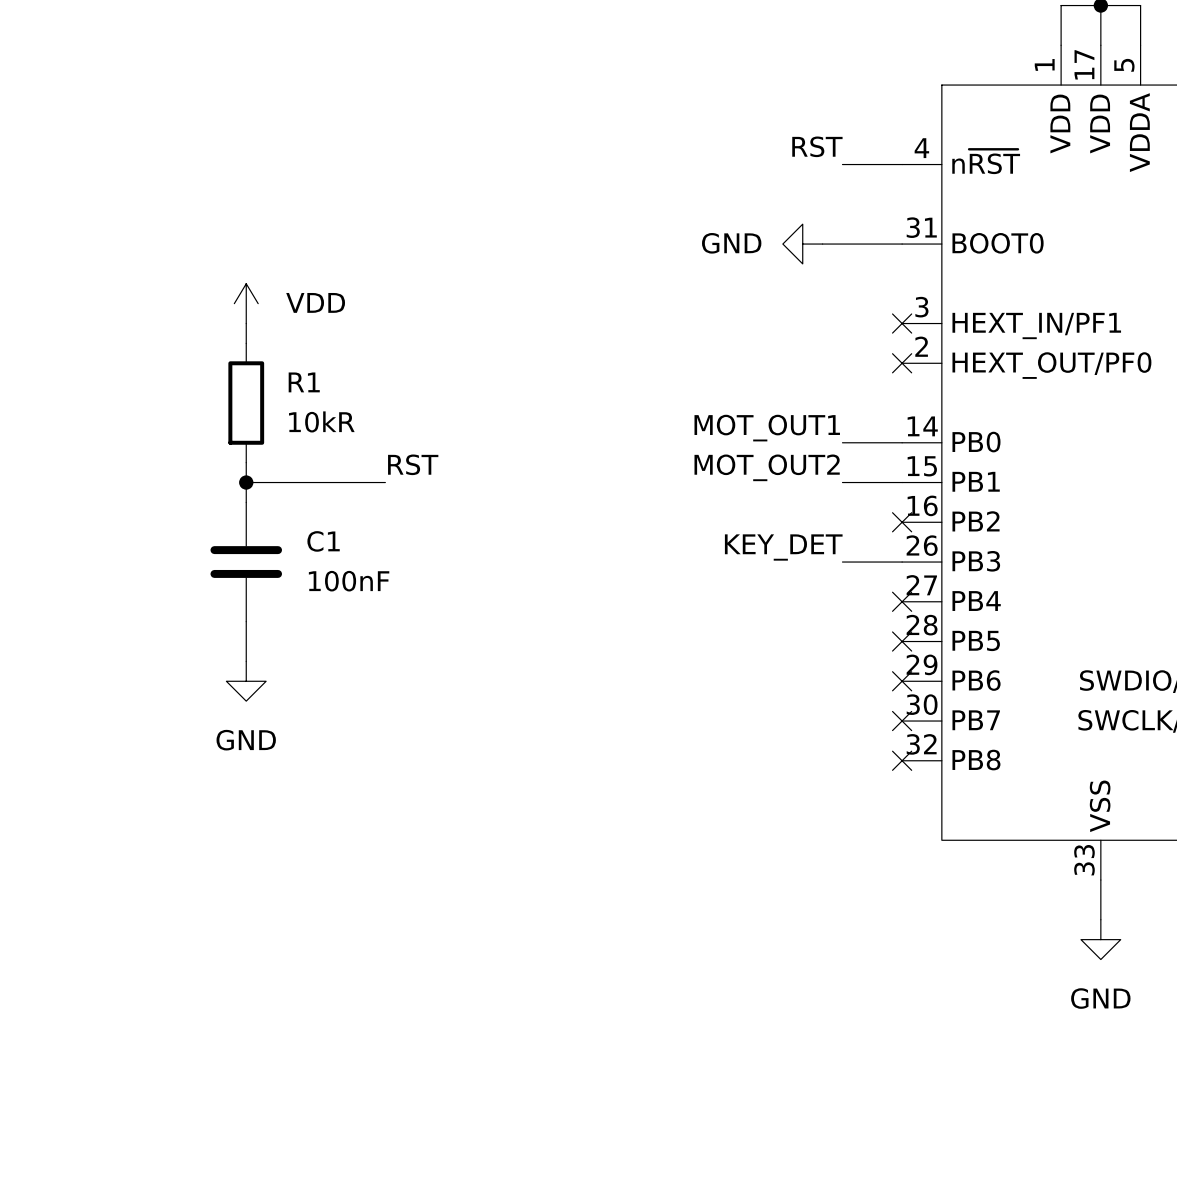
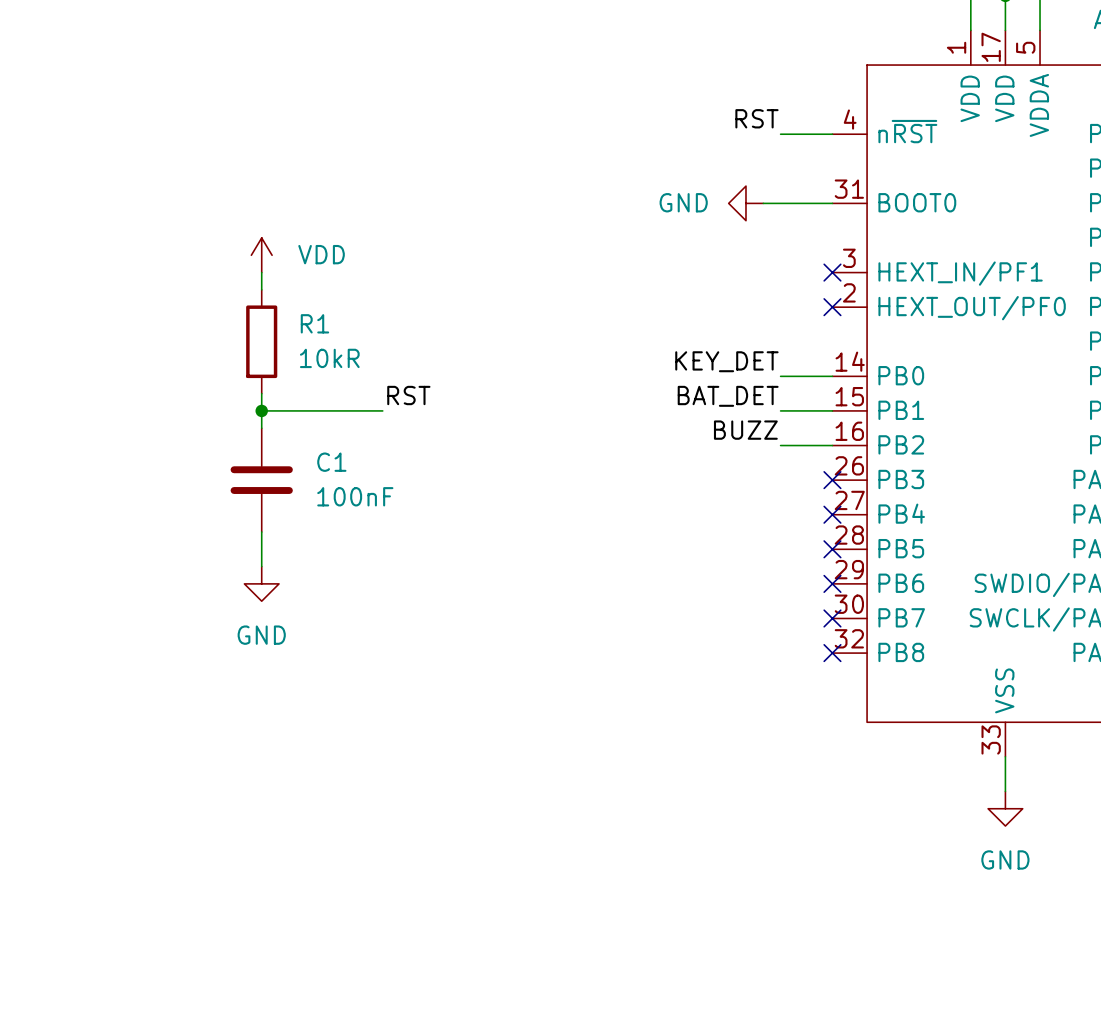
label: MOT_OUT1 (767, 428) -> KEY_DET (726, 361)
label: MOT_OUT2 (767, 467) -> BAT_DET (728, 396)
label: none -> BUZZ (745, 430)
no-connect mark position: (902, 522) -> (832, 480)
label: KEY_DET (783, 547) -> none
wire: (842, 562) (902, 562) -> (780, 445) (832, 445)

